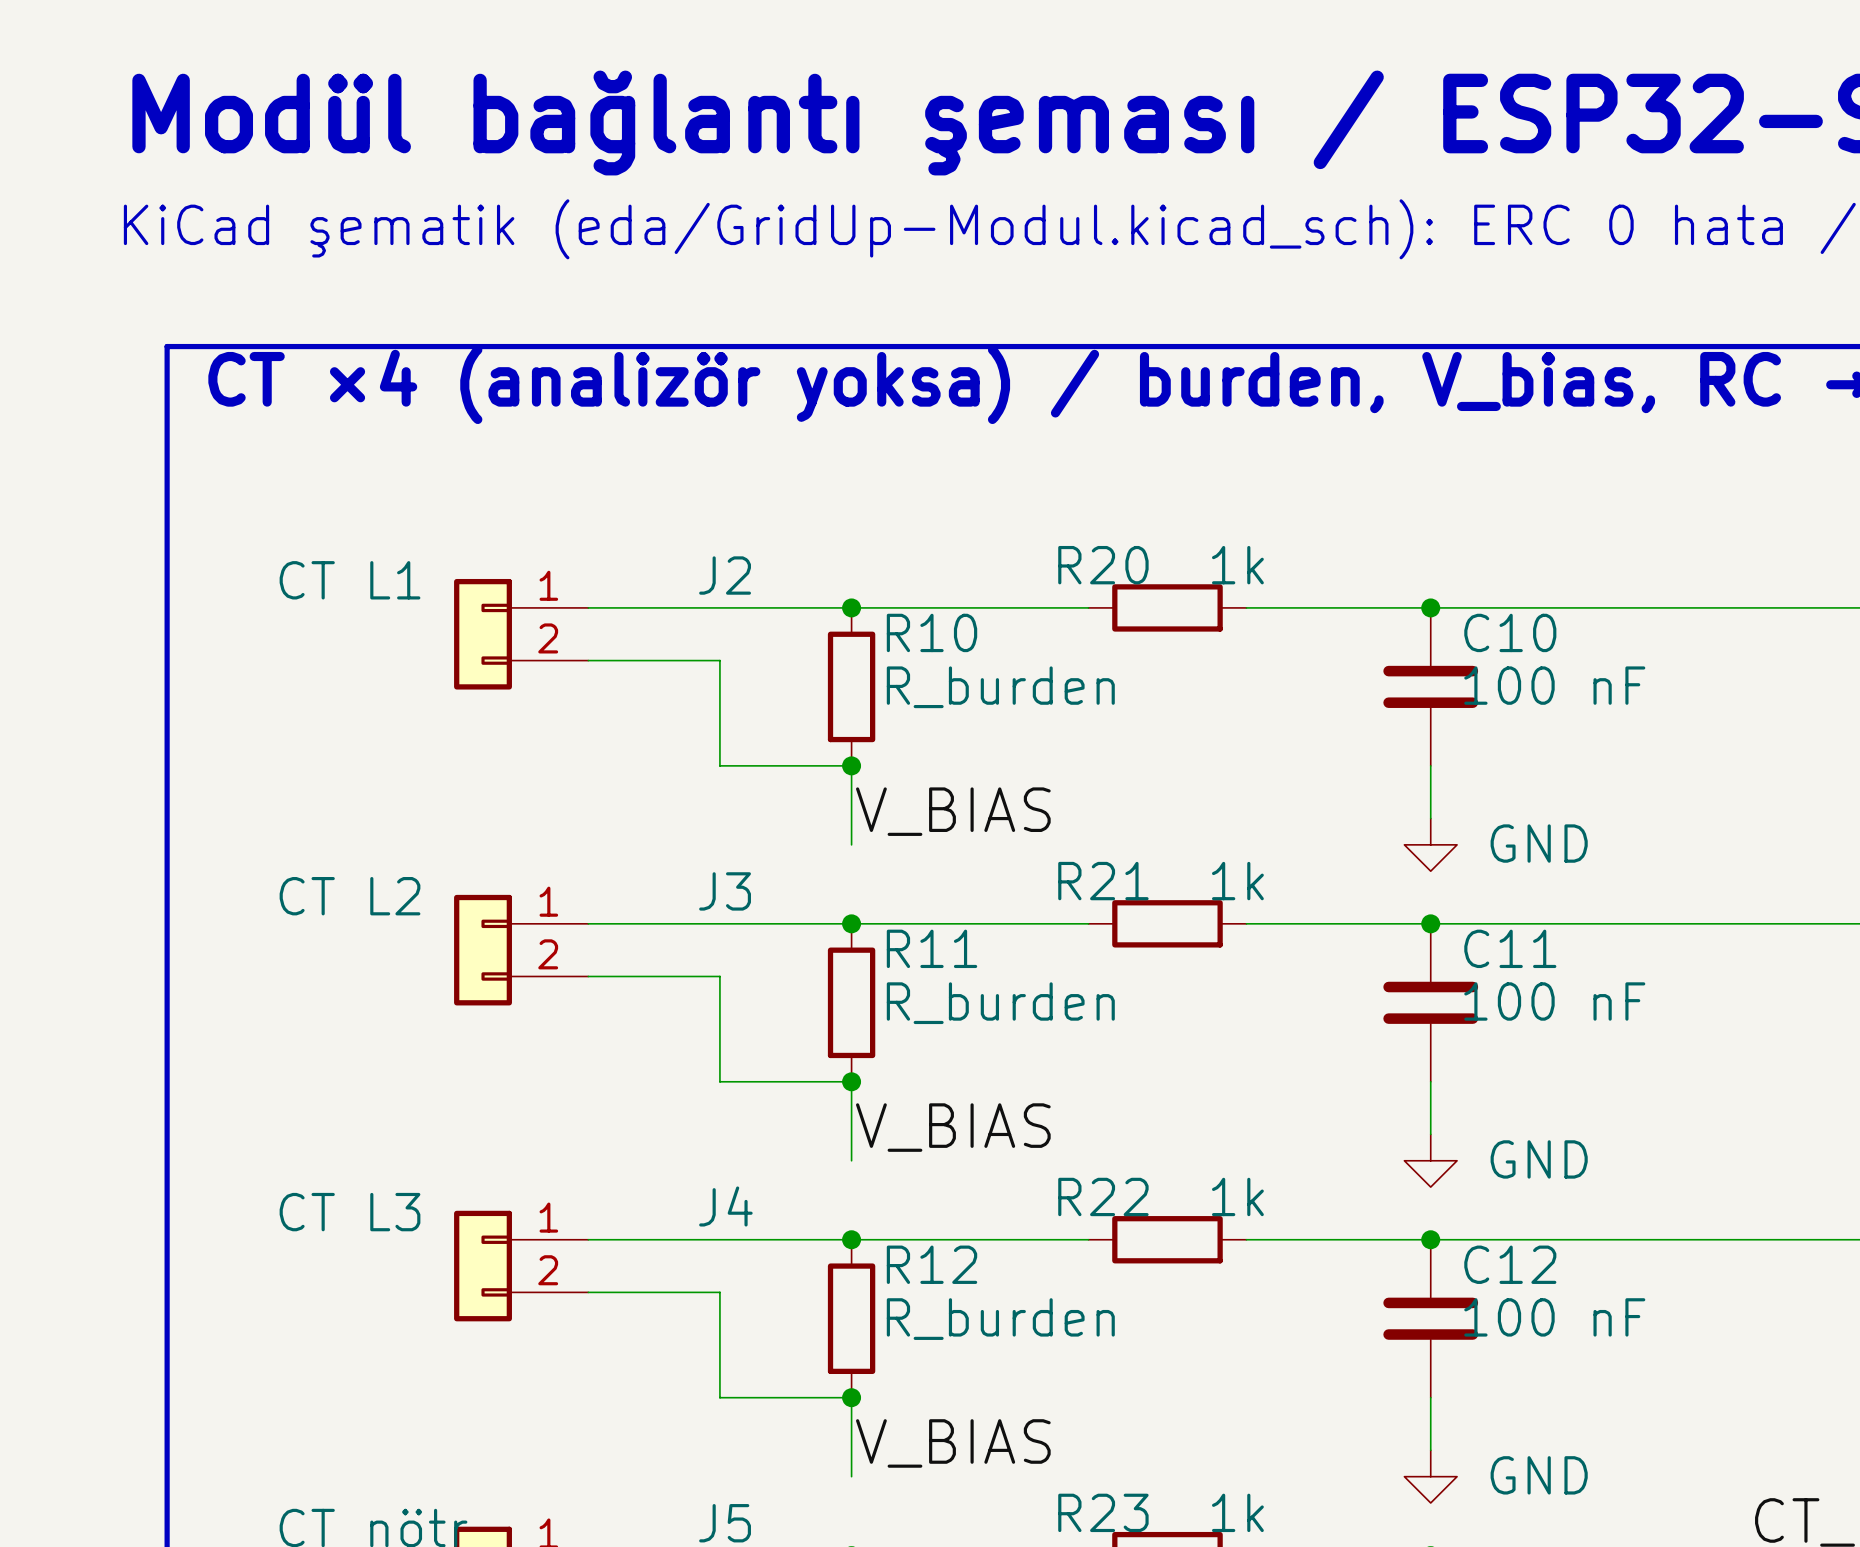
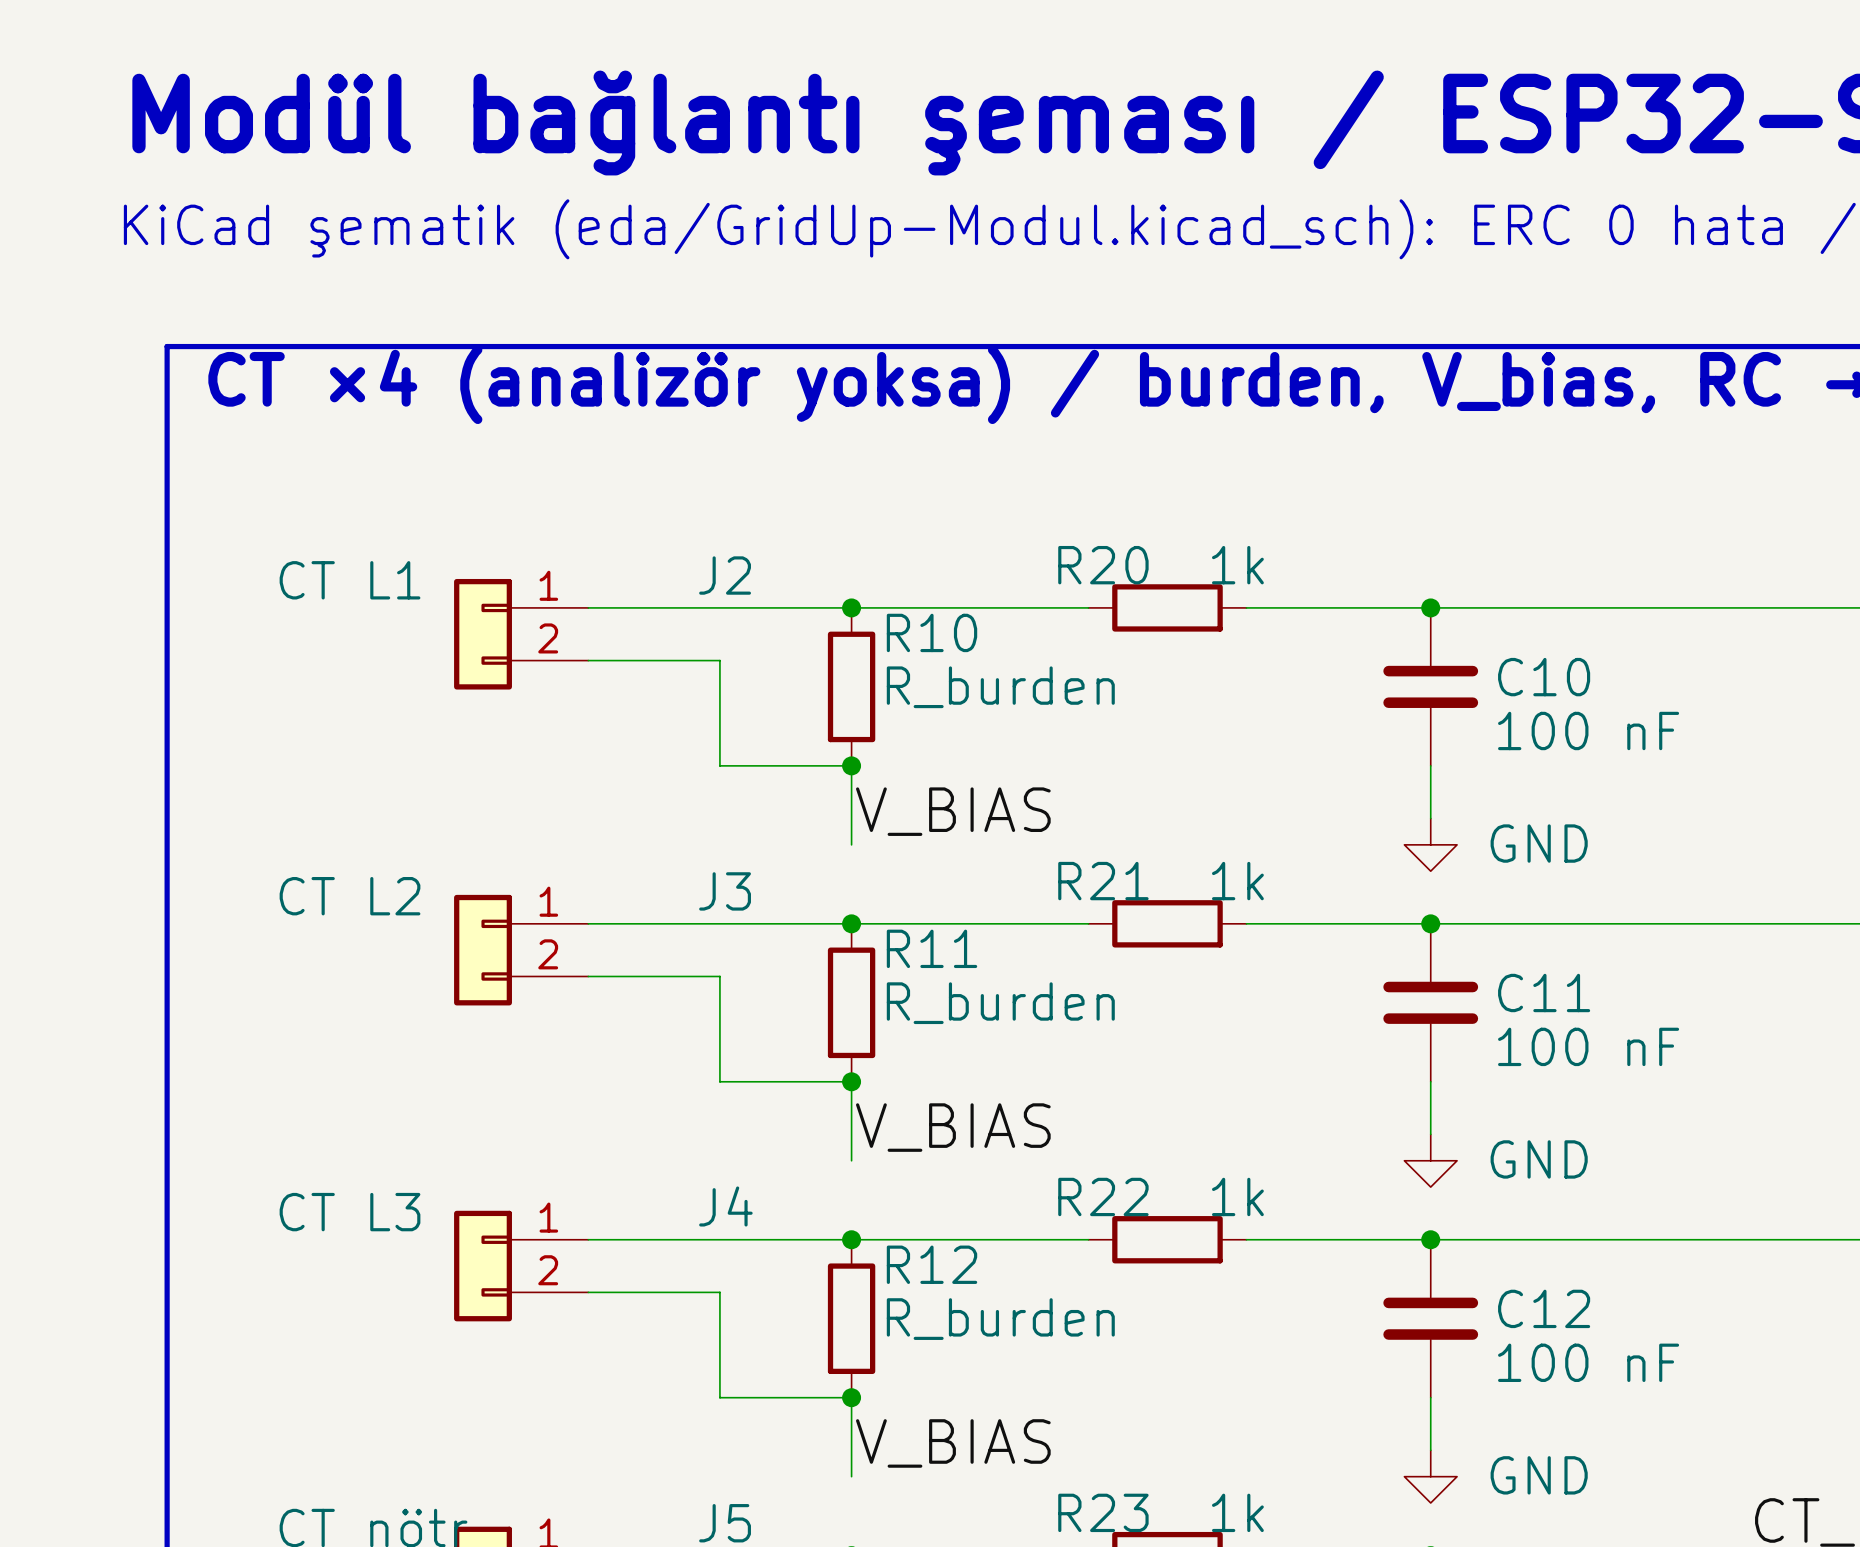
C10 name position: C10 (1510, 632) -> C10 (1544, 677)
C10 value position: 100 nF (1554, 685) -> 100 nF (1588, 730)
C11 name position: C11 (1510, 948) -> C11 (1544, 993)
C11 value position: 100 nF (1554, 1001) -> 100 nF (1588, 1046)
C12 name position: C12 (1510, 1264) -> C12 (1544, 1308)
C12 value position: 100 nF (1554, 1317) -> 100 nF (1588, 1362)

